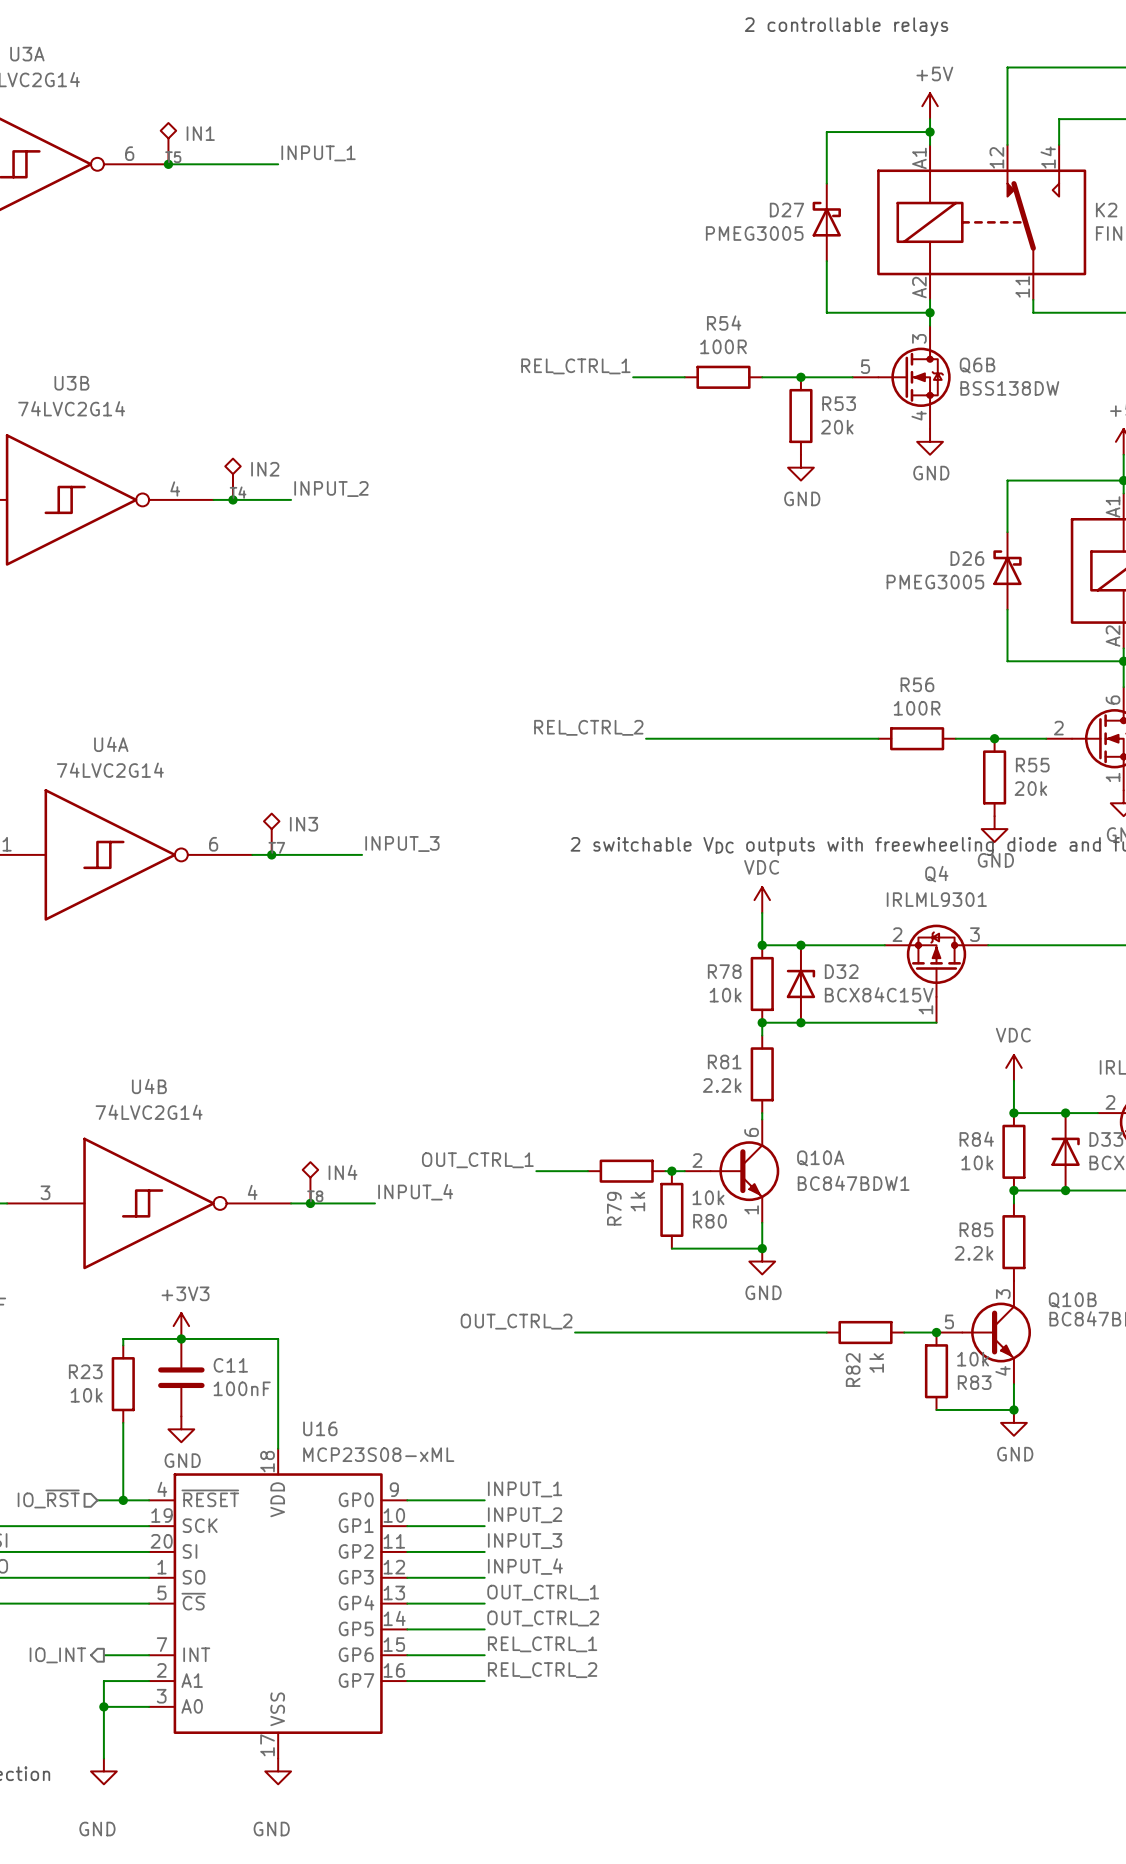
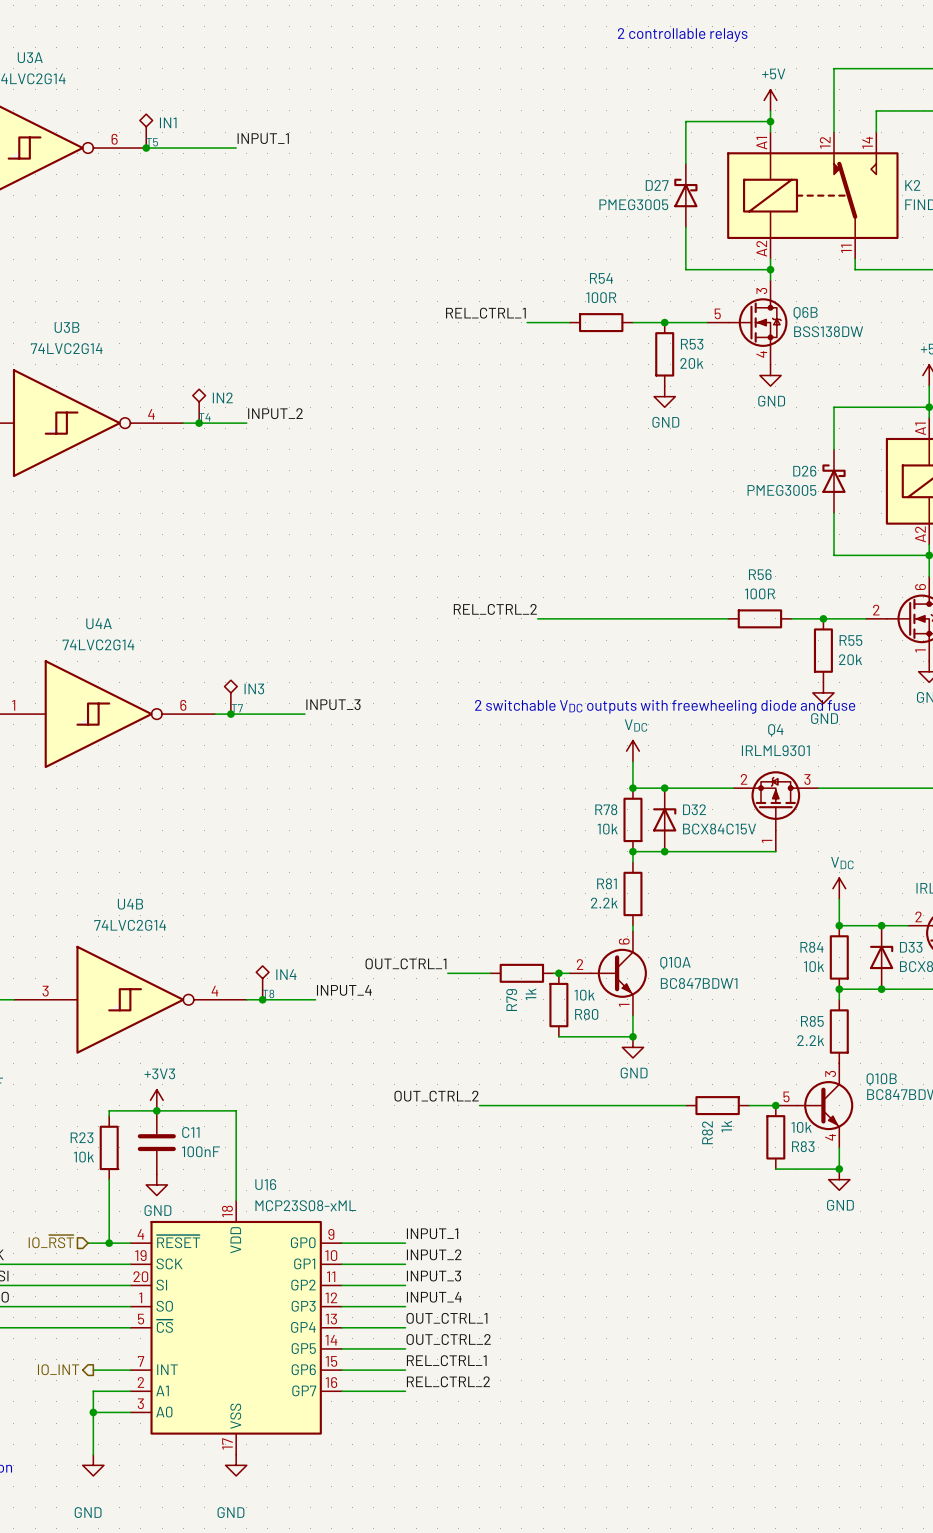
power symbol: VDC (762, 900) -> VDC (632, 751)
power symbol: VDC (1013, 1067) -> VDC (839, 888)

